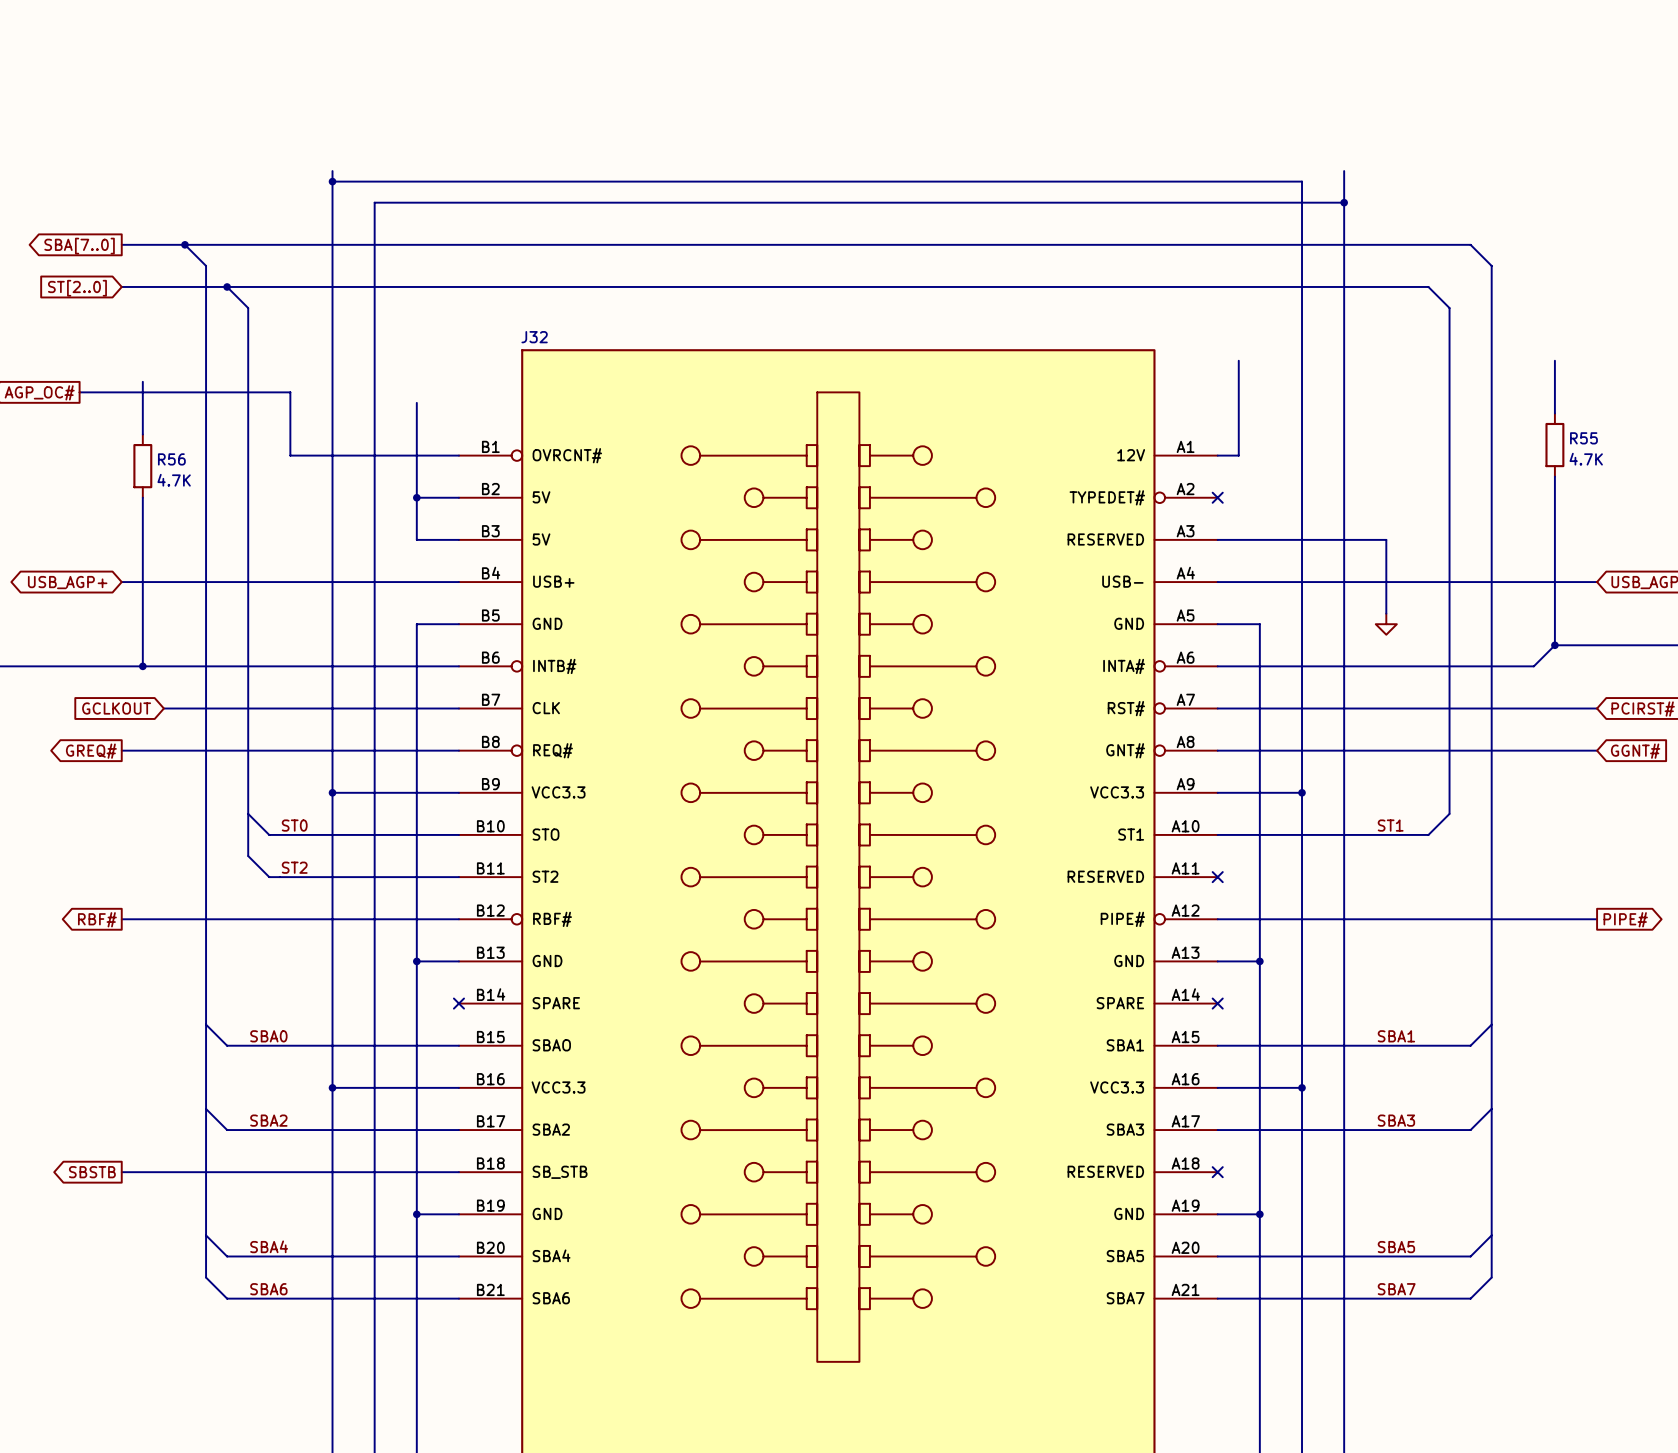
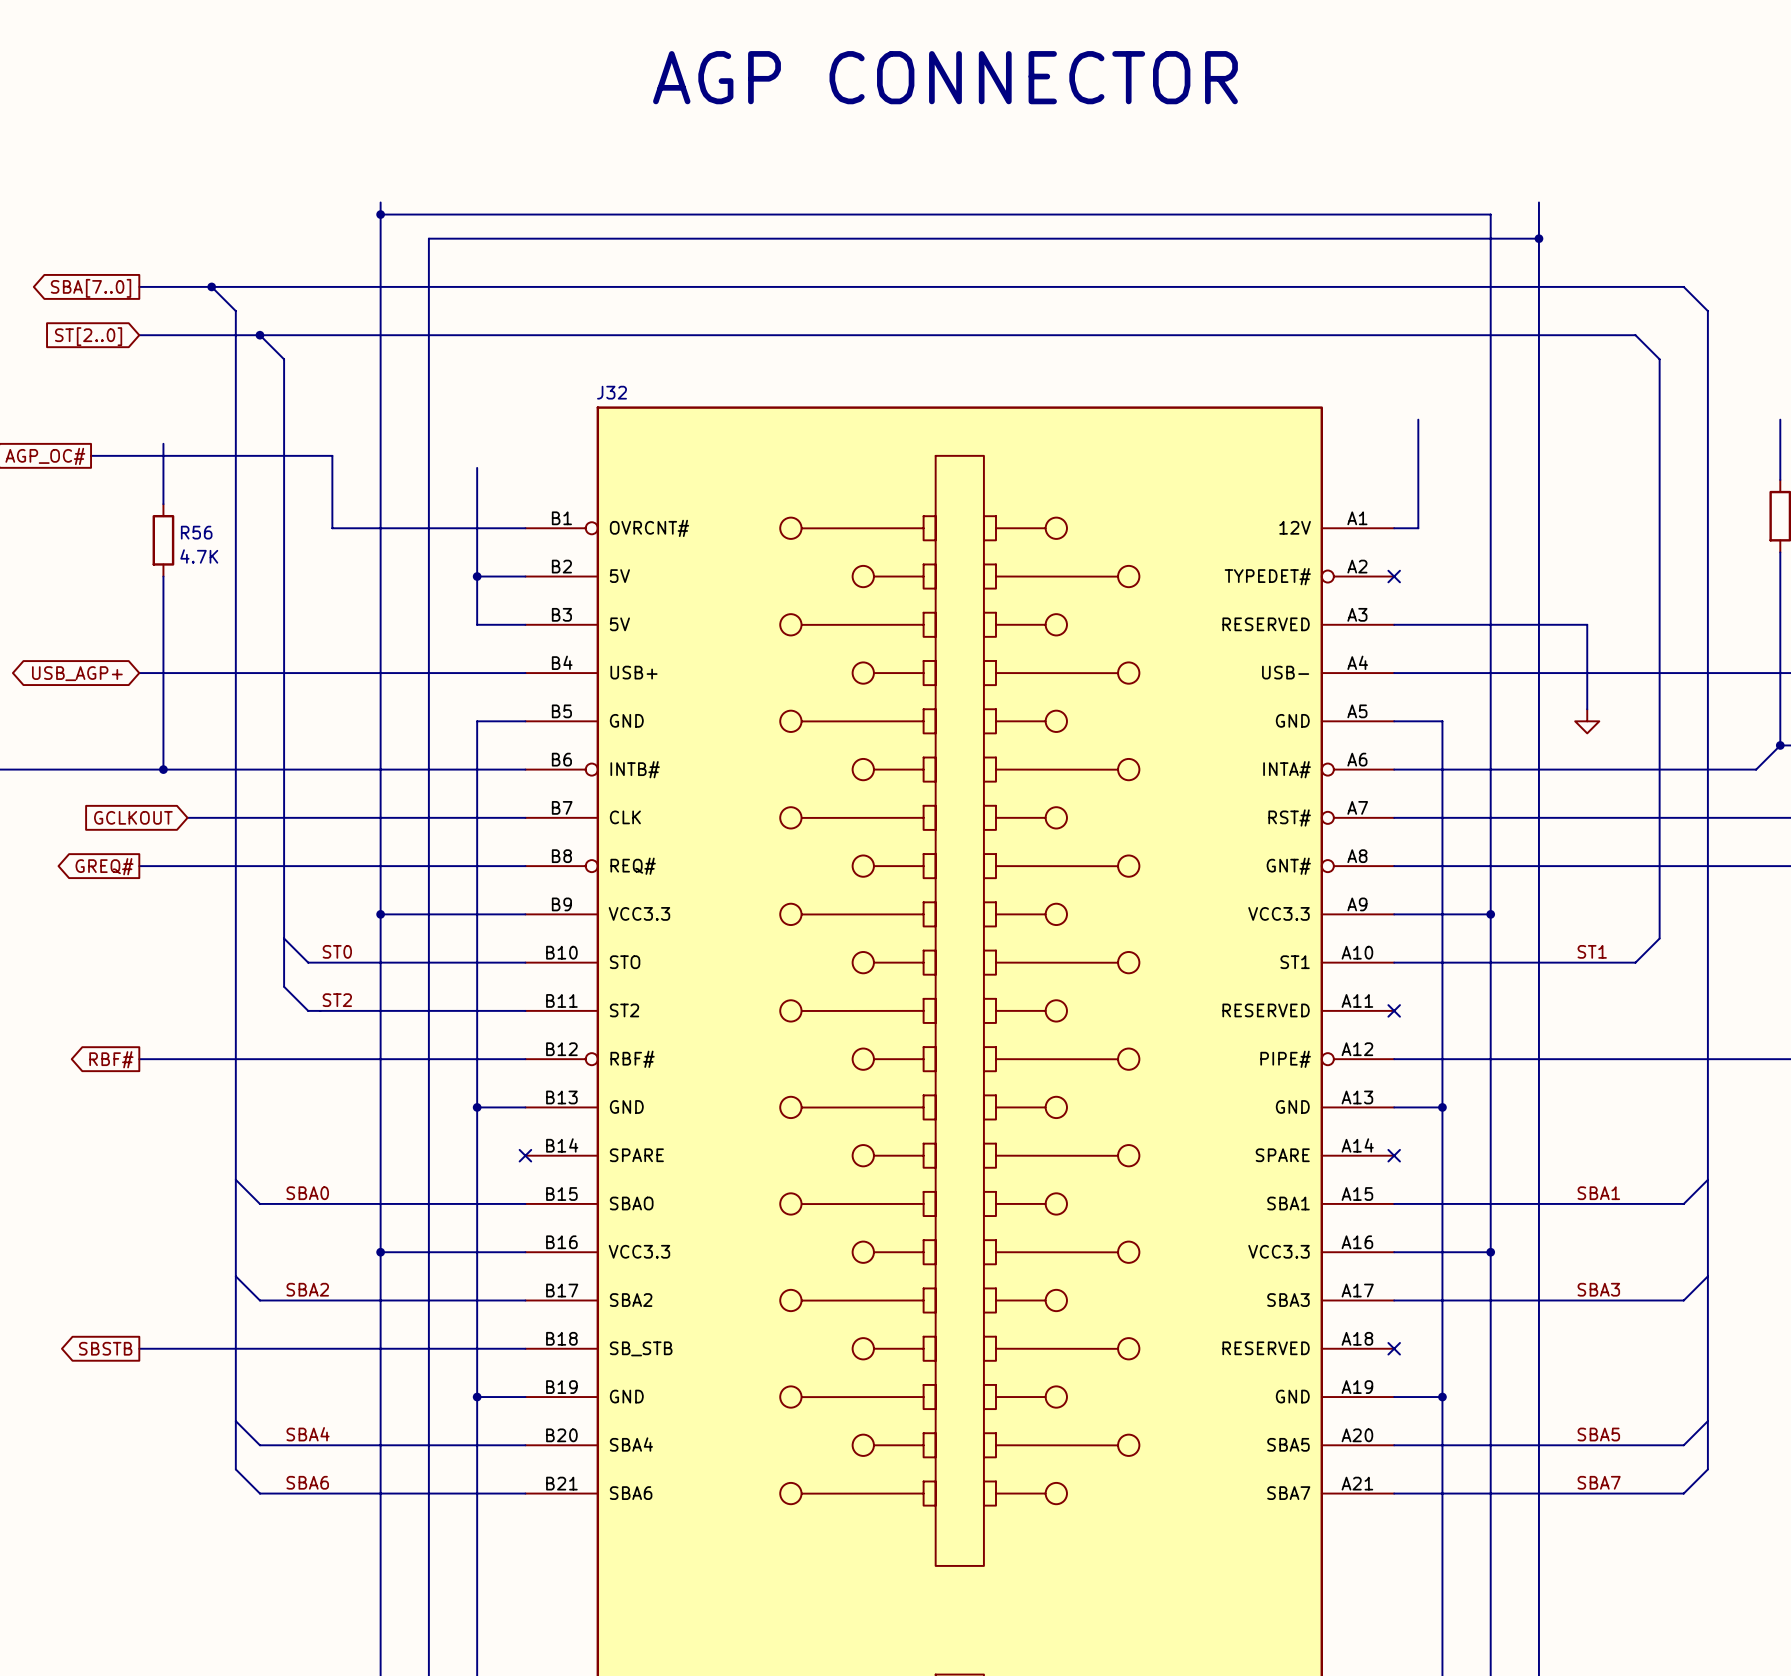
text: none -> AGP CONNECTOR (945, 77)

